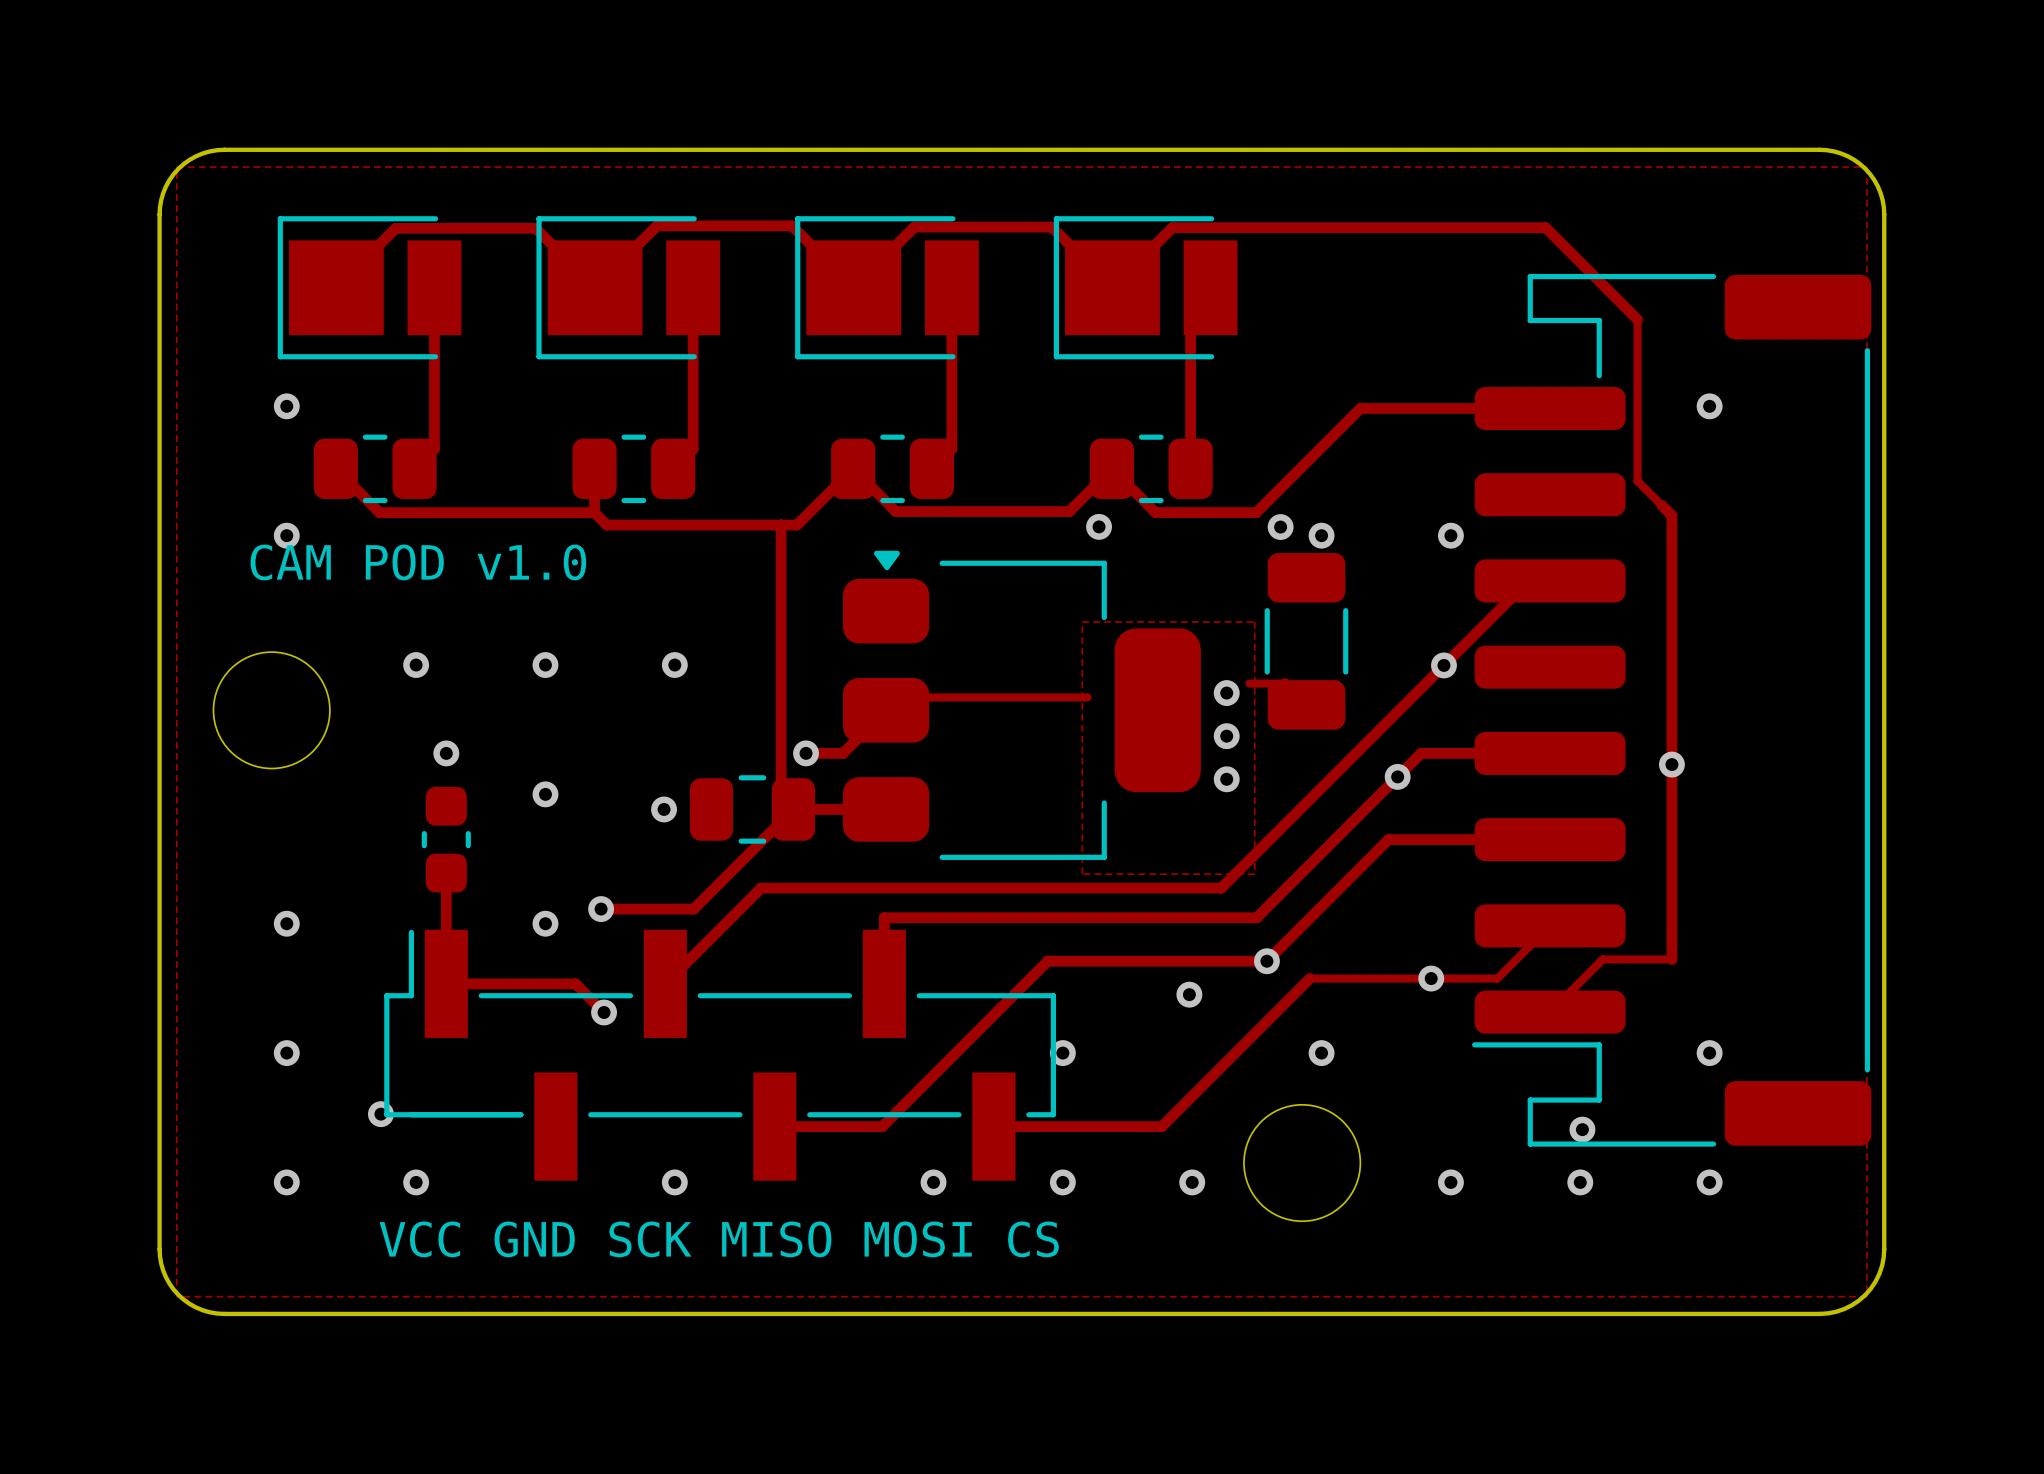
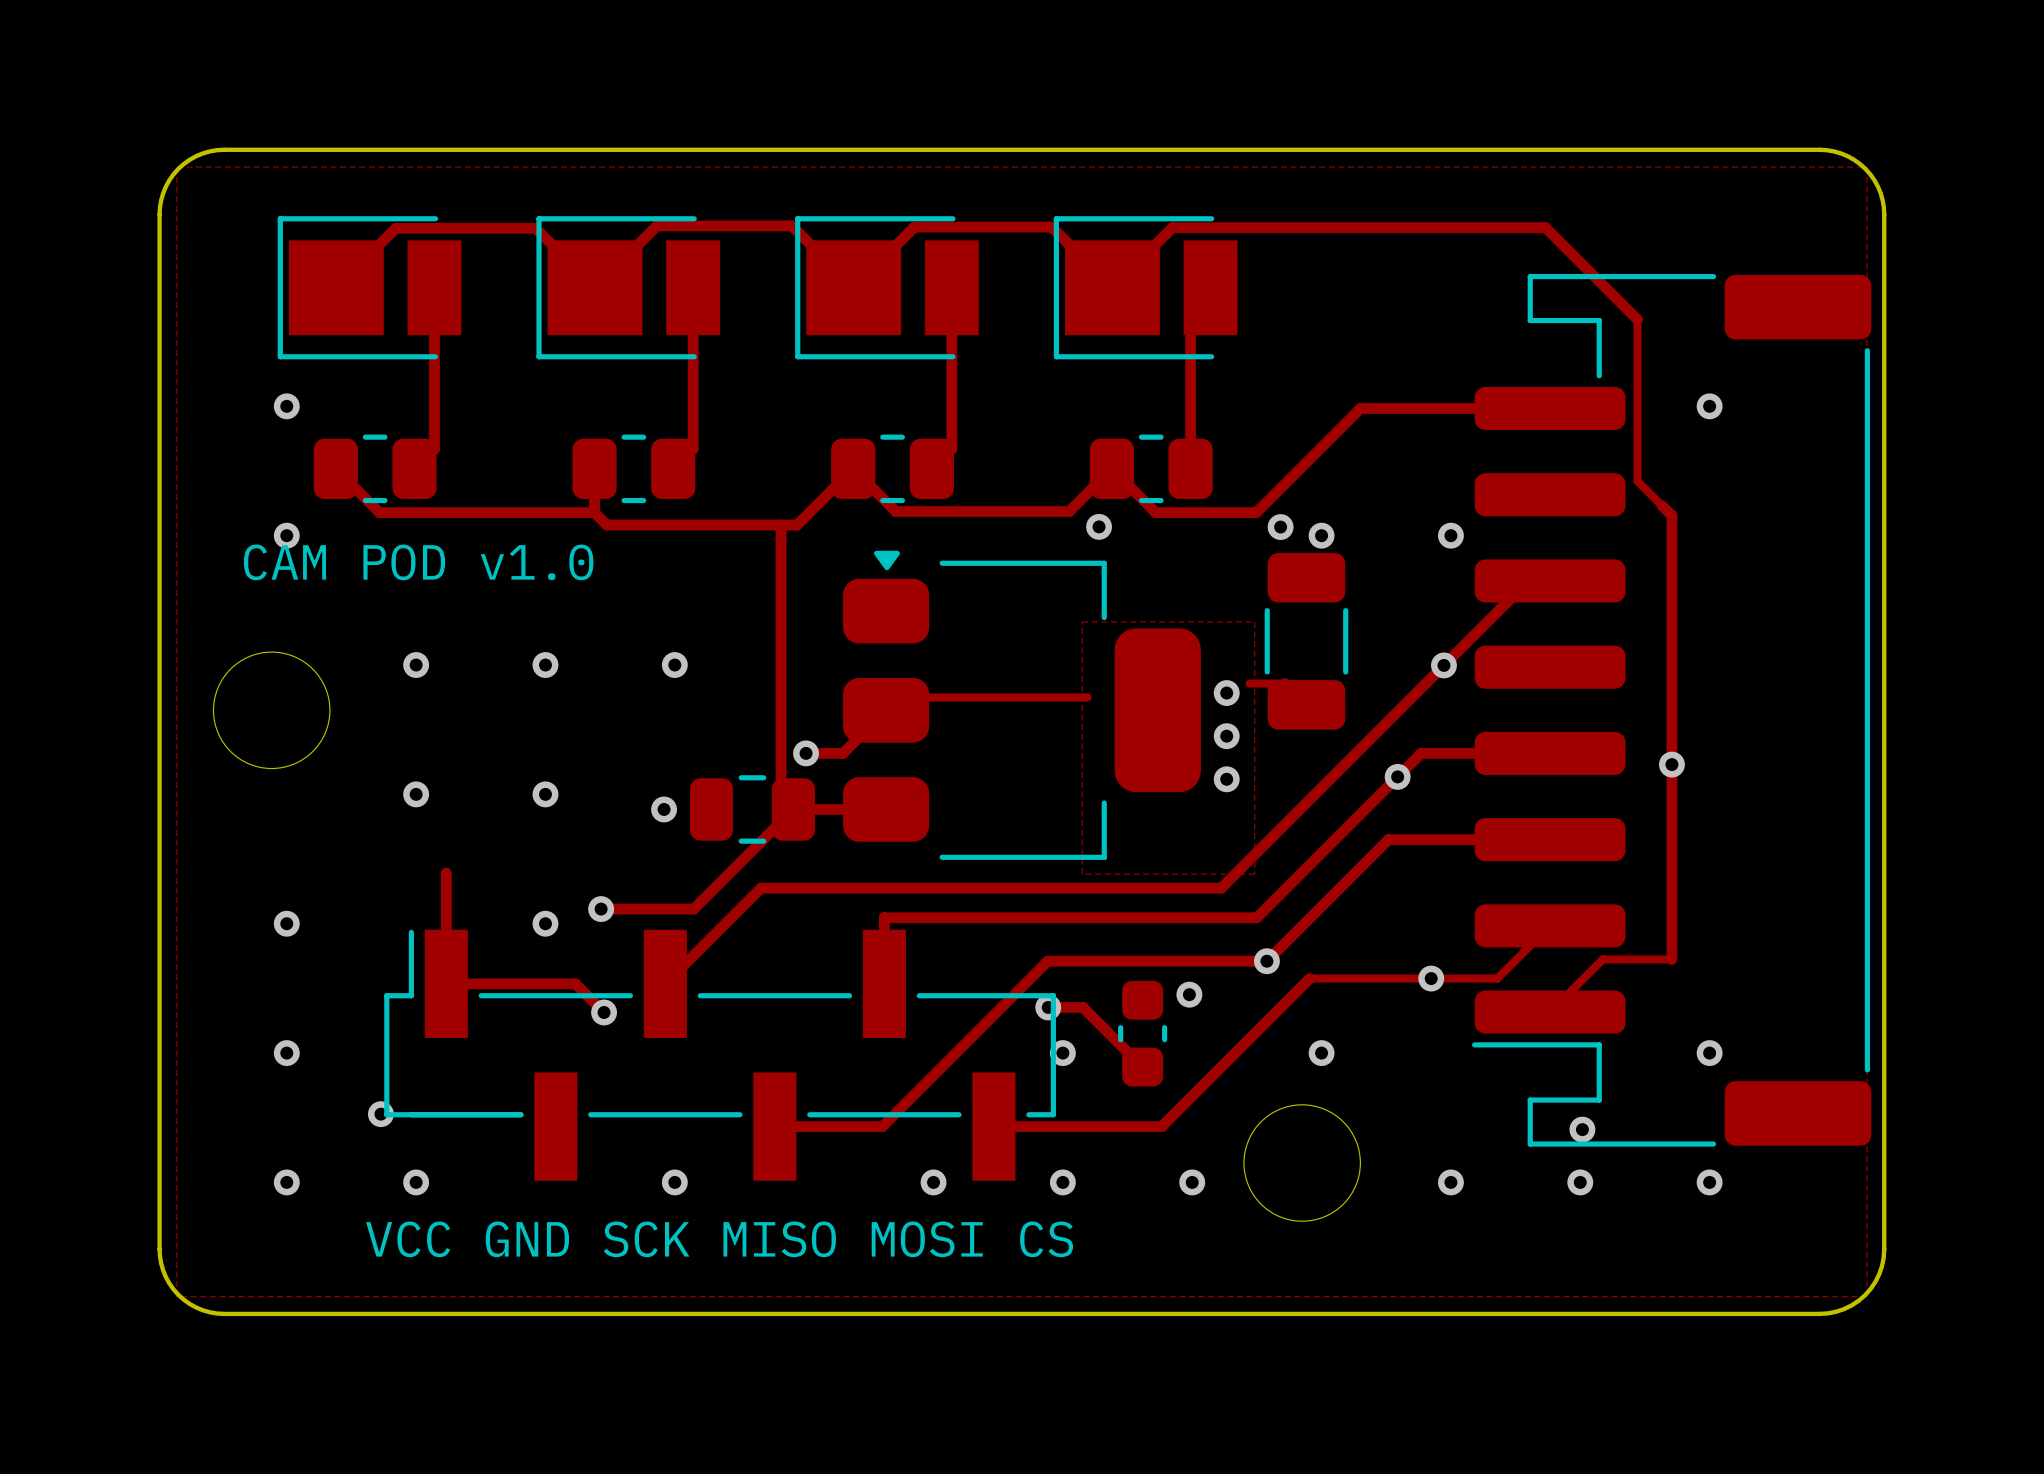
via position: (446, 753) -> (416, 794)
part position: (446, 839) -> (1142, 1033)
track: none -> (1048, 1007) (1083, 1007) (1142, 1067)
via: none -> (1048, 1007)

